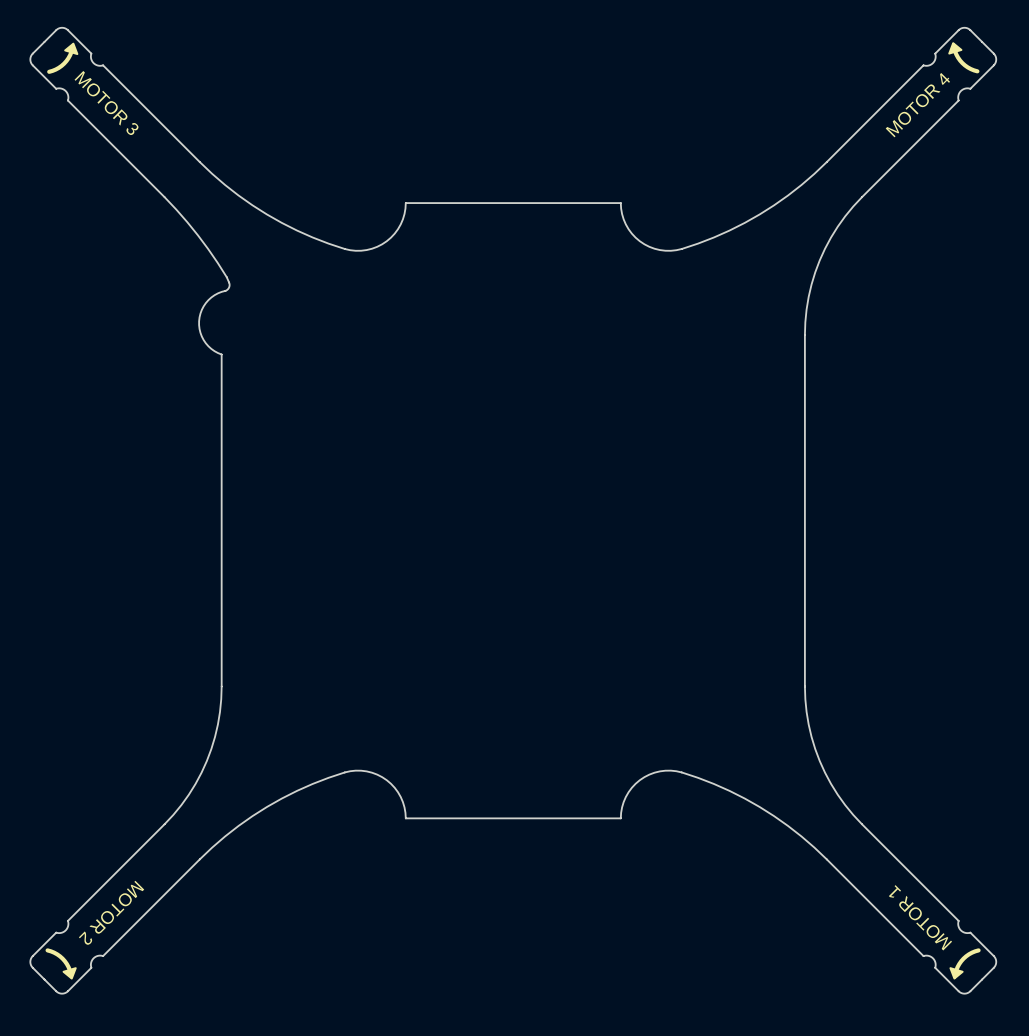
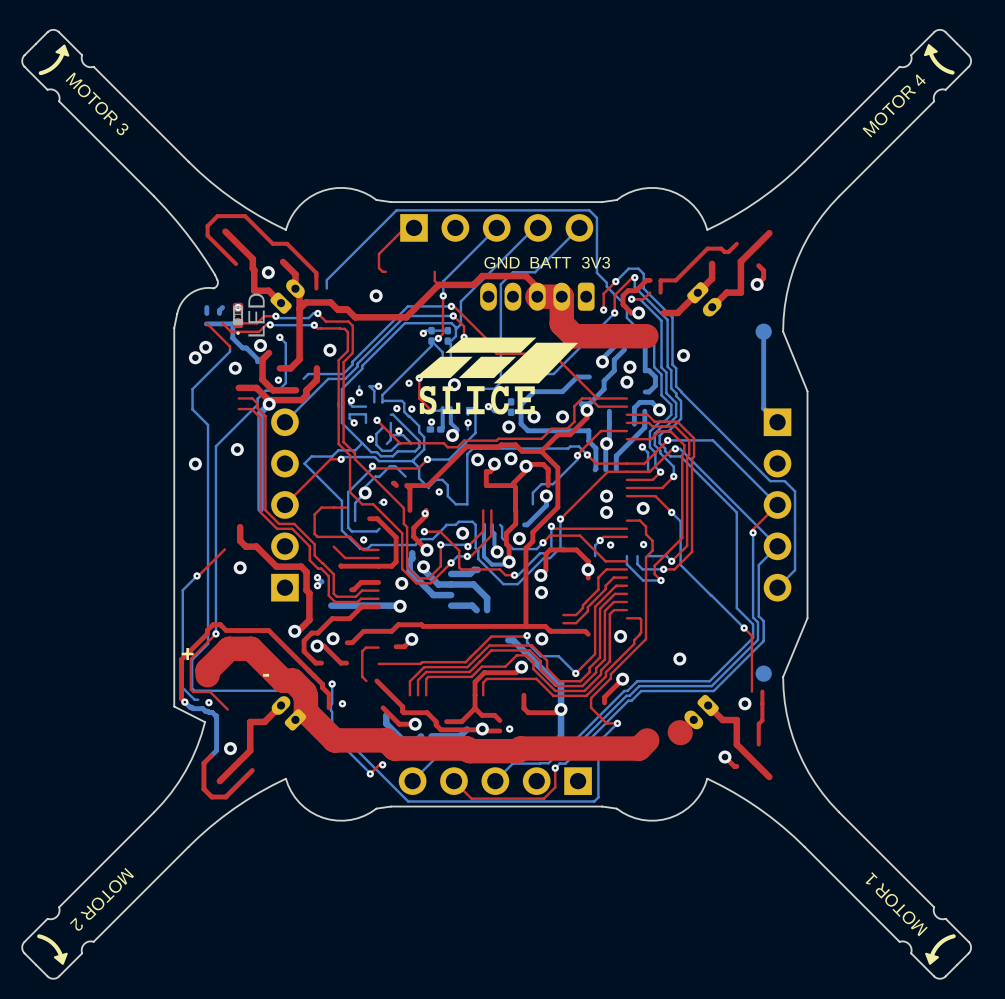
drawing shape: [29, 27, 997, 995] -> [21, 29, 972, 980]
top track: none -> (414, 227) (405, 227) (378, 253) (378, 268) (382, 271) (385, 271)
bottom track: none -> (496, 227) (443, 281) (443, 295)
part: none -> (496, 227)
bottom track: none -> (538, 227) (534, 227) (460, 301) (460, 324) (455, 329)
bottom track: none -> (579, 227) (535, 272) (512, 272) (500, 284) (500, 382) (494, 388) (478, 388)
top track: none -> (225, 231) (252, 258) (254, 290) (268, 290) (281, 303)
top track: none -> (769, 233) (740, 261) (740, 292) (726, 292) (712, 307)
top track: none -> (736, 243) (728, 251) (724, 251) (721, 248) (707, 248) (675, 280) (660, 280) (660, 292)
top track: none -> (283, 261) (295, 274) (295, 288) (299, 292) (299, 359) (290, 368) (279, 368)
text: none -> GND (502, 262)
text: none -> BATT (550, 262)
text: none -> 3V3 (596, 262)
top track: none -> (712, 263) (712, 278) (677, 312) (663, 312)
top track: none -> (236, 264) (207, 235) (207, 226) (217, 216) (245, 216) (272, 243) (287, 243) (316, 273) (316, 288)
top track: none -> (758, 265) (763, 270) (763, 277) (757, 284)
via: none -> (268, 272)
top track: none -> (434, 271) (434, 280) (438, 284)
top track: none -> (634, 277) (632, 277) (614, 295) (614, 312)
bottom track: none -> (634, 277) (634, 287) (667, 319) (667, 366) (671, 370) (671, 388) (681, 400) (681, 418) (668, 431) (663, 431) (659, 435) (659, 443) (670, 456) (680, 456) (736, 512) (736, 608) (753, 624) (753, 637) (709, 681) (637, 681) (627, 690) (624, 690) (561, 753) (551, 753) (546, 758) (537, 758) (435, 758) (412, 781)
via: none -> (634, 277)
top track: none -> (650, 280) (646, 280) (636, 290) (628, 290) (623, 295) (623, 304) (631, 312) (638, 312)
top track: none -> (615, 281) (603, 293) (603, 310)
bottom track: none -> (615, 281) (628, 268) (638, 268) (643, 273) (643, 288) (672, 317) (672, 364) (676, 368) (676, 386) (770, 481) (784, 481) (795, 491) (795, 570) (777, 587)
via: none -> (615, 281)
via: none -> (757, 284)
top track: none -> (438, 284) (473, 284) (482, 276) (525, 276) (537, 287) (537, 296) (561, 296) (561, 323) (574, 336) (646, 336)
top track: none -> (438, 284) (406, 317) (355, 317) (347, 309) (337, 309) (330, 302) (306, 302) (299, 308)
bottom track: none -> (326, 288) (326, 280) (396, 210) (589, 210) (596, 217) (596, 272) (606, 282) (606, 286) (626, 306) (626, 317) (654, 345) (654, 367) (661, 374) (661, 395) (671, 404) (671, 414) (664, 421) (659, 421) (649, 431) (649, 447) (655, 452) (655, 466) (660, 472)
top track: none -> (650, 292) (643, 299) (631, 299)
via: none -> (376, 295)
top track: none -> (443, 295) (443, 333) (438, 338)
via: none -> (443, 295)
part: none -> (287, 296)
part: none -> (537, 296)
bottom track: none -> (631, 299) (639, 299) (661, 320) (661, 367) (666, 372) (666, 393) (676, 402) (676, 416) (666, 426) (661, 426) (654, 433) (654, 445) (673, 466) (673, 476)
via: none -> (631, 299)
part: none -> (704, 299)
top track: none -> (451, 306) (454, 306) (488, 340) (488, 345) (496, 353) (552, 353) (597, 398) (626, 398)
bottom track: none -> (451, 306) (407, 306) (352, 361) (352, 364) (343, 374) (308, 374) (303, 378)
via: none -> (451, 306)
bottom track: none -> (206, 307) (206, 313)
bottom track: none -> (222, 307) (219, 313)
via: none -> (238, 307)
via: none -> (603, 310)
bottom track: none -> (614, 312) (553, 374) (508, 374)
via: none -> (614, 312)
via: none -> (638, 312)
top track: none -> (317, 313) (325, 321) (348, 321) (352, 325) (352, 353) (343, 362) (343, 442) (354, 453) (354, 459) (403, 508) (403, 523) (407, 527) (407, 567) (418, 578) (428, 578) (440, 566) (440, 544)
bottom track: none -> (317, 313) (313, 313) (308, 318) (277, 318) (275, 316)
via: none -> (317, 313)
top track: none -> (275, 316) (264, 316) (257, 323) (238, 323)
via: none -> (275, 316)
top track: none -> (453, 315) (464, 326) (464, 337)
bottom track: none -> (453, 315) (405, 315) (357, 363) (357, 366) (345, 378) (328, 378) (284, 422)
via: none -> (453, 315)
part: none -> LED (238, 318)
top track: none -> (206, 323) (230, 347)
top track: none -> (222, 323) (231, 331) (259, 331) (266, 324) (270, 324)
bottom track: none -> (206, 323) (232, 323) (232, 338) (242, 347) (246, 347) (257, 359) (257, 361)
bottom track: none -> (270, 324) (314, 325)
via: none -> (270, 324)
top track: none -> (314, 325) (317, 328) (344, 328) (347, 331) (347, 351) (338, 360) (338, 444) (350, 455) (350, 492) (362, 504) (373, 504) (402, 533) (402, 569) (416, 583) (430, 583) (451, 562)
via: none -> (314, 325)
bottom track: none -> (447, 330) (426, 330) (423, 333)
bottom track: none -> (763, 331) (763, 408) (777, 422)
part: none -> (763, 331)
via: none -> (423, 333)
part: none -> (431, 335)
part: none -> (447, 335)
bottom track: none -> (279, 337) (285, 343) (285, 383) (278, 390) (265, 390) (257, 398) (257, 404) (215, 446) (215, 633)
via: none -> (279, 337)
drawing: none -> [415, 337, 579, 415]
via: none -> (464, 337)
via: none -> (438, 338)
via: none -> (260, 345)
via: none -> (205, 347)
bottom track: none -> (230, 347) (230, 351) (192, 389) (192, 409) (208, 424) (208, 643) (192, 659) (192, 688) (194, 690) (287, 690) (370, 773)
via: none -> (329, 350)
bottom track: none -> (624, 349) (614, 359) (614, 370) (604, 380) (604, 389) (589, 403) (581, 403) (587, 410)
top track: none -> (269, 352) (262, 359) (262, 379) (273, 390) (296, 390)
via: none -> (683, 355)
via: none -> (195, 357)
bottom track: none -> (442, 361) (442, 352) (431, 341) (431, 346) (382, 395) (382, 402) (401, 400) (404, 403) (404, 411) (419, 426) (419, 432) (424, 437) (424, 449) (413, 461)
bottom track: none -> (450, 361) (450, 344) (447, 341) (451, 341) (455, 336) (455, 327) (451, 323) (404, 323) (341, 389) (341, 422) (371, 452) (376, 452) (381, 456) (392, 456) (397, 451) (415, 451) (419, 447) (419, 441) (393, 414) (390, 414)
bottom track: none -> (602, 361) (602, 358) (619, 341) (639, 341) (645, 346) (645, 370) (649, 370) (655, 376) (655, 385) (649, 391) (645, 391)
via: none -> (602, 361)
via: none -> (630, 367)
via: none -> (235, 368)
top track: none -> (316, 368) (316, 379) (306, 390) (306, 395) (301, 400) (268, 400) (256, 387) (238, 387)
bottom track: none -> (589, 377) (577, 377) (562, 391) (534, 391) (521, 404) (521, 423) (528, 430) (588, 430) (588, 441) (595, 448) (595, 469)
top track: none -> (419, 378) (419, 398) (431, 410)
via: none -> (419, 378)
via: none -> (278, 380)
via: none -> (626, 382)
via: none -> (409, 383)
via: none -> (454, 384)
bottom track: none -> (359, 386) (359, 392)
bottom track: none -> (378, 386) (369, 386) (374, 390) (374, 402)
via: none -> (378, 386)
via: none -> (359, 392)
top track: none -> (238, 398) (252, 398) (257, 403) (257, 408) (265, 415) (265, 510) (279, 523) (294, 523) (314, 544) (314, 555) (333, 574) (333, 593) (336, 596) (355, 596) (362, 590) (378, 590)
bottom track: none -> (351, 400) (349, 403) (352, 406) (365, 406)
via: none -> (351, 400)
bottom track: none -> (269, 404) (260, 412) (260, 509)
via: none -> (269, 404)
bottom track: none -> (488, 406) (493, 412) (497, 412)
via: none -> (488, 406)
part: none -> (511, 407)
top track: none -> (626, 406) (598, 406) (590, 398) (582, 398) (574, 406) (574, 421) (567, 428) (551, 428) (541, 438) (464, 440) (457, 447) (447, 447) (443, 443) (400, 443) (377, 420)
bottom track: none -> (450, 408) (450, 423) (457, 429) (452, 435)
top track: none -> (238, 409) (251, 409) (260, 417) (260, 512) (277, 528) (292, 528) (309, 546) (309, 560) (328, 576) (328, 595) (335, 602) (357, 602) (361, 598) (378, 598)
via: none -> (396, 408)
via: none -> (411, 409)
top track: none -> (587, 410) (587, 417) (570, 434) (557, 434) (541, 451)
via: none -> (587, 410)
bottom track: none -> (659, 409) (652, 402) (639, 402) (634, 407) (634, 424)
via: none -> (659, 409)
bottom track: none -> (431, 410) (440, 410) (442, 408) (442, 427) (440, 429)
bottom track: none -> (609, 411) (609, 440) (605, 444) (605, 469)
bottom track: none -> (644, 411) (644, 427) (616, 455) (616, 469)
bottom track: none -> (468, 414) (467, 408) (475, 409) (475, 433) (448, 459) (427, 459)
top track: none -> (626, 414) (647, 414) (654, 421) (677, 421) (694, 438) (694, 456) (692, 458) (692, 551) (674, 569) (663, 569)
via: none -> (534, 416)
via: none -> (562, 416)
via: none -> (377, 420)
bottom track: none -> (354, 422) (349, 418) (349, 414) (365, 414) (365, 422)
via: none -> (354, 422)
bottom track: none -> (390, 422) (390, 439) (386, 443)
via: none -> (431, 422)
bottom track: none -> (468, 422) (467, 429)
via: none -> (468, 422)
top track: none -> (626, 422) (648, 422) (652, 426) (675, 426) (689, 440) (689, 454) (687, 456) (687, 545) (671, 561)
via: none -> (508, 426)
bottom track: none -> (382, 427) (376, 433) (376, 444) (382, 450) (391, 450) (400, 443)
part: none -> (435, 429)
via: none -> (398, 431)
top track: none -> (626, 431) (600, 431) (577, 455)
bottom track: none -> (390, 435) (403, 435) (410, 443)
via: none -> (452, 435)
via: none -> (370, 439)
top track: none -> (626, 439) (651, 439) (659, 431) (670, 431) (684, 445) (684, 452) (682, 454) (682, 538) (654, 565) (654, 574) (661, 580)
top track: none -> (667, 440) (644, 463) (596, 463) (587, 454)
bottom track: none -> (667, 440) (712, 440) (777, 504)
via: none -> (667, 440)
bottom track: none -> (362, 443) (355, 450) (338, 450) (332, 456) (311, 456) (304, 463) (341, 501) (341, 530) (360, 548) (367, 548) (371, 545) (415, 545) (421, 539) (432, 539) (446, 524) (455, 524) (458, 521) (472, 521) (475, 524) (475, 547) (478, 550) (478, 559) (503, 584) (517, 584) (543, 558) (550, 558) (560, 547) (560, 519)
via: none -> (606, 443)
bottom track: none -> (642, 447) (648, 452) (648, 469)
via: none -> (642, 447)
via: none -> (237, 449)
top track: none -> (675, 448) (672, 448) (649, 471) (607, 471) (560, 519)
bottom track: none -> (675, 448) (680, 448) (777, 546) (758, 565) (758, 616) (763, 621) (763, 641) (713, 691) (641, 691) (631, 700) (628, 700) (565, 763) (559, 763) (555, 768)
via: none -> (675, 448)
top track: none -> (541, 451) (522, 451) (515, 444) (466, 446) (427, 485) (406, 485) (409, 488) (409, 510)
top track: none -> (541, 451) (557, 467) (557, 507) (532, 532) (532, 541) (525, 548) (525, 626)
bottom track: none -> (587, 454) (578, 446) (570, 446) (568, 448) (472, 448) (467, 454) (467, 504) (455, 504) (447, 496) (447, 485) (442, 479) (436, 479) (428, 488) (419, 478) (419, 467) (412, 461) (378, 461) (374, 457) (343, 457) (341, 459)
via: none -> (587, 454)
bottom track: none -> (577, 455) (577, 459) (552, 484) (541, 484) (532, 492) (532, 504)
via: none -> (577, 455)
top track: none -> (341, 459) (330, 459) (284, 504)
via: none -> (341, 459)
via: none -> (511, 458)
top track: none -> (427, 459) (418, 468) (374, 468) (372, 466)
via: none -> (427, 459)
via: none -> (477, 459)
via: none -> (195, 464)
top track: none -> (494, 464) (494, 467) (490, 471) (486, 471) (486, 485) (513, 485)
via: none -> (494, 464)
bottom track: none -> (372, 466) (348, 492) (348, 527) (351, 531) (376, 531) (379, 528)
via: none -> (372, 466)
via: none -> (526, 466)
top track: none -> (660, 472) (652, 479) (626, 479)
via: none -> (660, 472)
bottom track: none -> (405, 476) (395, 466) (389, 466) (379, 476) (375, 476) (365, 486) (365, 492) (355, 503) (355, 521)
top track: none -> (673, 476) (662, 488) (626, 488)
via: none -> (673, 476)
top track: none -> (393, 483) (396, 485)
top track: none -> (513, 485) (513, 482) (532, 464) (543, 464) (548, 469) (548, 485)
top track: none -> (513, 485) (515, 487) (515, 523) (506, 533) (509, 562)
via: none -> (439, 491)
via: none -> (365, 492)
bottom track: none -> (546, 496) (546, 505) (527, 524) (524, 524)
via: none -> (546, 496)
via: none -> (606, 496)
top track: none -> (626, 496) (655, 496) (671, 512)
bottom track: none -> (383, 502) (379, 502)
via: none -> (383, 502)
part: none -> (284, 504)
top track: none -> (777, 504) (753, 529) (753, 532)
part: none -> (777, 504)
top track: none -> (346, 507) (321, 507) (314, 514) (314, 534) (317, 536) (350, 536) (363, 549) (378, 549)
via: none -> (643, 508)
top track: none -> (426, 510) (426, 515) (413, 527) (413, 536) (426, 550)
top track: none -> (483, 510) (483, 531) (467, 546)
top track: none -> (491, 510) (491, 535) (470, 556) (467, 556)
via: none -> (606, 512)
bottom track: none -> (671, 512) (680, 521) (680, 565) (744, 628)
via: none -> (671, 512)
via: none -> (425, 513)
top track: none -> (369, 518) (377, 518) (396, 537) (396, 561) (391, 566) (340, 565)
via: none -> (560, 519)
top track: none -> (626, 520) (639, 520) (646, 526) (646, 534) (652, 540) (652, 550) (646, 557) (646, 639) (610, 674) (610, 678) (591, 698) (591, 707) (606, 723) (617, 723)
bottom track: none -> (484, 525) (484, 556) (491, 564) (506, 564) (509, 562)
bottom track: none -> (491, 524) (494, 545)
bottom track: none -> (500, 524) (502, 526) (502, 538) (513, 549) (536, 549) (543, 542)
top track: none -> (240, 527) (240, 540) (245, 546) (256, 546) (276, 566) (301, 566) (306, 571) (306, 590) (309, 593) (309, 620) (298, 631) (294, 631)
top track: none -> (551, 526) (553, 528) (626, 528)
bottom track: none -> (551, 526) (551, 549) (547, 553) (540, 553) (518, 575) (514, 575)
via: none -> (551, 526)
top track: none -> (424, 531) (440, 531) (459, 550) (459, 567) (461, 569) (499, 569) (505, 575) (514, 575)
via: none -> (424, 531)
bottom track: none -> (753, 532) (753, 617) (757, 622) (757, 639) (711, 686) (639, 686) (629, 695) (626, 695) (563, 758) (553, 758) (548, 763) (512, 763) (495, 781)
via: none -> (753, 532)
via: none -> (462, 533)
top track: none -> (626, 536) (603, 536) (600, 540)
via: none -> (519, 538)
via: none -> (363, 539)
bottom track: none -> (600, 540) (595, 545) (595, 556)
via: none -> (600, 540)
top track: none -> (543, 542) (549, 535) (579, 535) (605, 561) (626, 561)
via: none -> (543, 542)
bottom track: none -> (440, 544) (466, 544) (467, 546)
via: none -> (440, 544)
via: none -> (643, 544)
via: none -> (610, 545)
top track: none -> (333, 546) (345, 558) (378, 558)
via: none -> (467, 546)
top track: none -> (224, 549) (197, 575)
via: none -> (426, 550)
via: none -> (497, 551)
bottom track: none -> (412, 553) (409, 571) (433, 595) (451, 595)
bottom track: none -> (467, 556) (457, 556) (451, 562)
via: none -> (467, 556)
bottom track: none -> (626, 556) (626, 564) (643, 580) (661, 580)
bottom track: none -> (637, 556) (637, 564) (642, 569) (663, 569)
bottom track: none -> (648, 556) (666, 556) (671, 561)
via: none -> (671, 561)
via: none -> (509, 562)
via: none -> (451, 562)
bottom track: none -> (423, 566) (423, 569) (438, 584) (473, 584) (487, 598) (487, 610)
via: none -> (423, 566)
via: none -> (240, 567)
via: none -> (663, 569)
bottom track: none -> (477, 569) (474, 569) (470, 573) (451, 573)
via: none -> (588, 569)
top track: none -> (626, 569) (606, 569) (598, 577) (598, 589) (582, 605) (582, 608) (576, 615) (563, 615)
via: none -> (514, 575)
bottom track: none -> (197, 575) (182, 590) (182, 687) (194, 699) (198, 699)
via: none -> (197, 575)
top track: none -> (540, 575) (545, 570) (545, 554) (550, 549) (576, 549) (588, 561) (588, 578)
via: none -> (540, 575)
via: none -> (317, 577)
top track: none -> (626, 577) (613, 577) (605, 585) (605, 589) (587, 607) (587, 611) (576, 623) (563, 623)
via: none -> (661, 580)
bottom track: none -> (322, 581) (317, 585)
top track: none -> (378, 582) (361, 582) (351, 589)
via: none -> (401, 583)
via: none -> (317, 585)
top track: none -> (626, 585) (616, 585) (595, 606) (595, 654) (575, 673)
via: none -> (541, 592)
top track: none -> (626, 593) (615, 593) (600, 608) (600, 657) (580, 681) (559, 681) (547, 668) (547, 660) (532, 645) (489, 645) (477, 656)
top track: none -> (626, 602) (613, 602) (604, 610) (604, 659) (596, 668) (596, 672) (582, 686) (557, 686) (540, 669) (540, 661) (529, 650) (491, 650) (480, 661)
bottom track: none -> (331, 605) (400, 606)
bottom track: none -> (451, 605) (472, 605) (476, 610)
via: none -> (400, 606)
top track: none -> (378, 606) (361, 606) (349, 618) (332, 618) (317, 633) (311, 633) (304, 640) (304, 651) (315, 663) (321, 663)
top track: none -> (626, 610) (613, 610) (609, 614) (609, 661) (601, 670) (601, 674) (584, 690) (555, 690) (533, 668) (533, 662) (526, 655) (516, 655) (505, 666) (481, 666) (471, 676) (428, 676) (426, 678) (426, 695)
top track: none -> (626, 618) (641, 619) (641, 632) (634, 640) (634, 643) (605, 672) (605, 676) (586, 695) (553, 695) (536, 678) (486, 678) (483, 682) (483, 695)
top track: none -> (744, 628) (751, 635) (751, 691)
via: none -> (744, 628)
via: none -> (294, 631)
top track: none -> (215, 633) (190, 658) (190, 689) (193, 691) (210, 691) (227, 709)
via: none -> (215, 633)
top track: none -> (588, 634) (585, 631) (550, 631) (545, 626) (398, 624) (391, 631) (363, 631) (352, 642) (347, 642)
top track: none -> (527, 635) (491, 636) (475, 652)
bottom track: none -> (527, 635) (527, 642) (540, 656) (558, 656) (575, 673)
via: none -> (527, 635)
via: none -> (620, 636)
via: none -> (333, 638)
via: none -> (541, 639)
top track: none -> (411, 639) (404, 646) (396, 646)
via: none -> (411, 639)
bottom track: none -> (508, 640) (513, 640) (556, 683) (561, 683) (560, 737)
top track: none -> (317, 646) (323, 646) (340, 663) (346, 663)
via: none -> (317, 646)
top track: none -> (378, 647) (365, 647) (362, 651) (362, 676) (366, 680)
top track: none -> (475, 652) (465, 662) (378, 663)
text: none -> + (187, 654)
top track: none -> (477, 656) (467, 667) (424, 667) (409, 681) (409, 695)
via: none -> (679, 659)
top track: none -> (479, 661) (469, 672) (426, 672) (418, 680) (418, 695)
top track: none -> (521, 667) (516, 672) (484, 672) (475, 682) (475, 708)
via: none -> (521, 667)
via: none -> (575, 673)
part: none -> (763, 673)
top track: none -> (207, 675) (207, 670) (229, 648) (251, 648) (282, 680) (293, 680) (304, 692) (305, 711) (334, 740) (386, 740) (394, 748) (467, 748) (469, 751) (517, 751) (520, 748) (639, 748) (647, 740) (644, 737)
text: none -> - (266, 675)
top track: none -> (622, 679) (604, 697) (604, 702)
via: none -> (622, 679)
top track: none -> (376, 680) (402, 706) (403, 712) (427, 712) (441, 729) (482, 729) (484, 730) (499, 730)
bottom track: none -> (332, 684) (332, 725) (408, 801) (594, 801) (598, 797) (598, 742) (617, 723)
via: none -> (332, 684)
top track: none -> (762, 691) (762, 720) (758, 724) (758, 744)
top track: none -> (523, 695) (523, 708) (528, 712) (557, 712) (561, 709)
top track: none -> (184, 702) (181, 698) (181, 659) (207, 633) (207, 630) (212, 624) (220, 624) (226, 630) (268, 630) (322, 684) (322, 687) (328, 693) (328, 708)
bottom track: none -> (184, 702) (193, 708) (202, 708) (216, 715) (216, 750) (211, 756)
via: none -> (184, 702)
via: none -> (208, 702)
via: none -> (342, 703)
via: none -> (744, 703)
top track: none -> (281, 705) (264, 721) (250, 721) (250, 750) (219, 781)
top track: none -> (708, 705) (722, 720) (736, 720) (736, 744) (769, 777)
top track: none -> (383, 707) (399, 724) (415, 724)
top track: none -> (475, 708) (461, 721) (446, 721)
top track: none -> (475, 708) (482, 715) (494, 715) (499, 720)
via: none -> (561, 709)
part: none -> (701, 712)
part: none -> (288, 713)
bottom track: none -> (386, 715) (386, 723) (402, 739) (417, 739) (421, 736)
via: none -> (617, 723)
via: none -> (415, 724)
bottom track: none -> (466, 729) (460, 736) (431, 736)
via: none -> (482, 729)
via: none -> (509, 729)
top track: none -> (679, 732) (680, 733)
via: none -> (230, 748)
top track: none -> (211, 756) (203, 763) (203, 789) (211, 797) (225, 797) (252, 770)
top track: none -> (724, 757) (734, 766) (736, 766)
via: none -> (724, 757)
top track: none -> (382, 764) (379, 764) (370, 773)
via: none -> (382, 764)
top track: none -> (555, 768) (555, 787) (543, 798) (471, 798) (453, 781)
via: none -> (555, 768)
via: none -> (370, 773)
part: none -> (495, 781)

